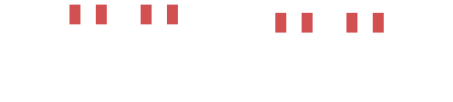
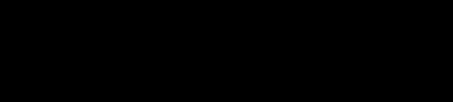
part: (88, 14) -> none
part: (159, 14) -> none
part: (293, 22) -> none
part: (365, 22) -> none

